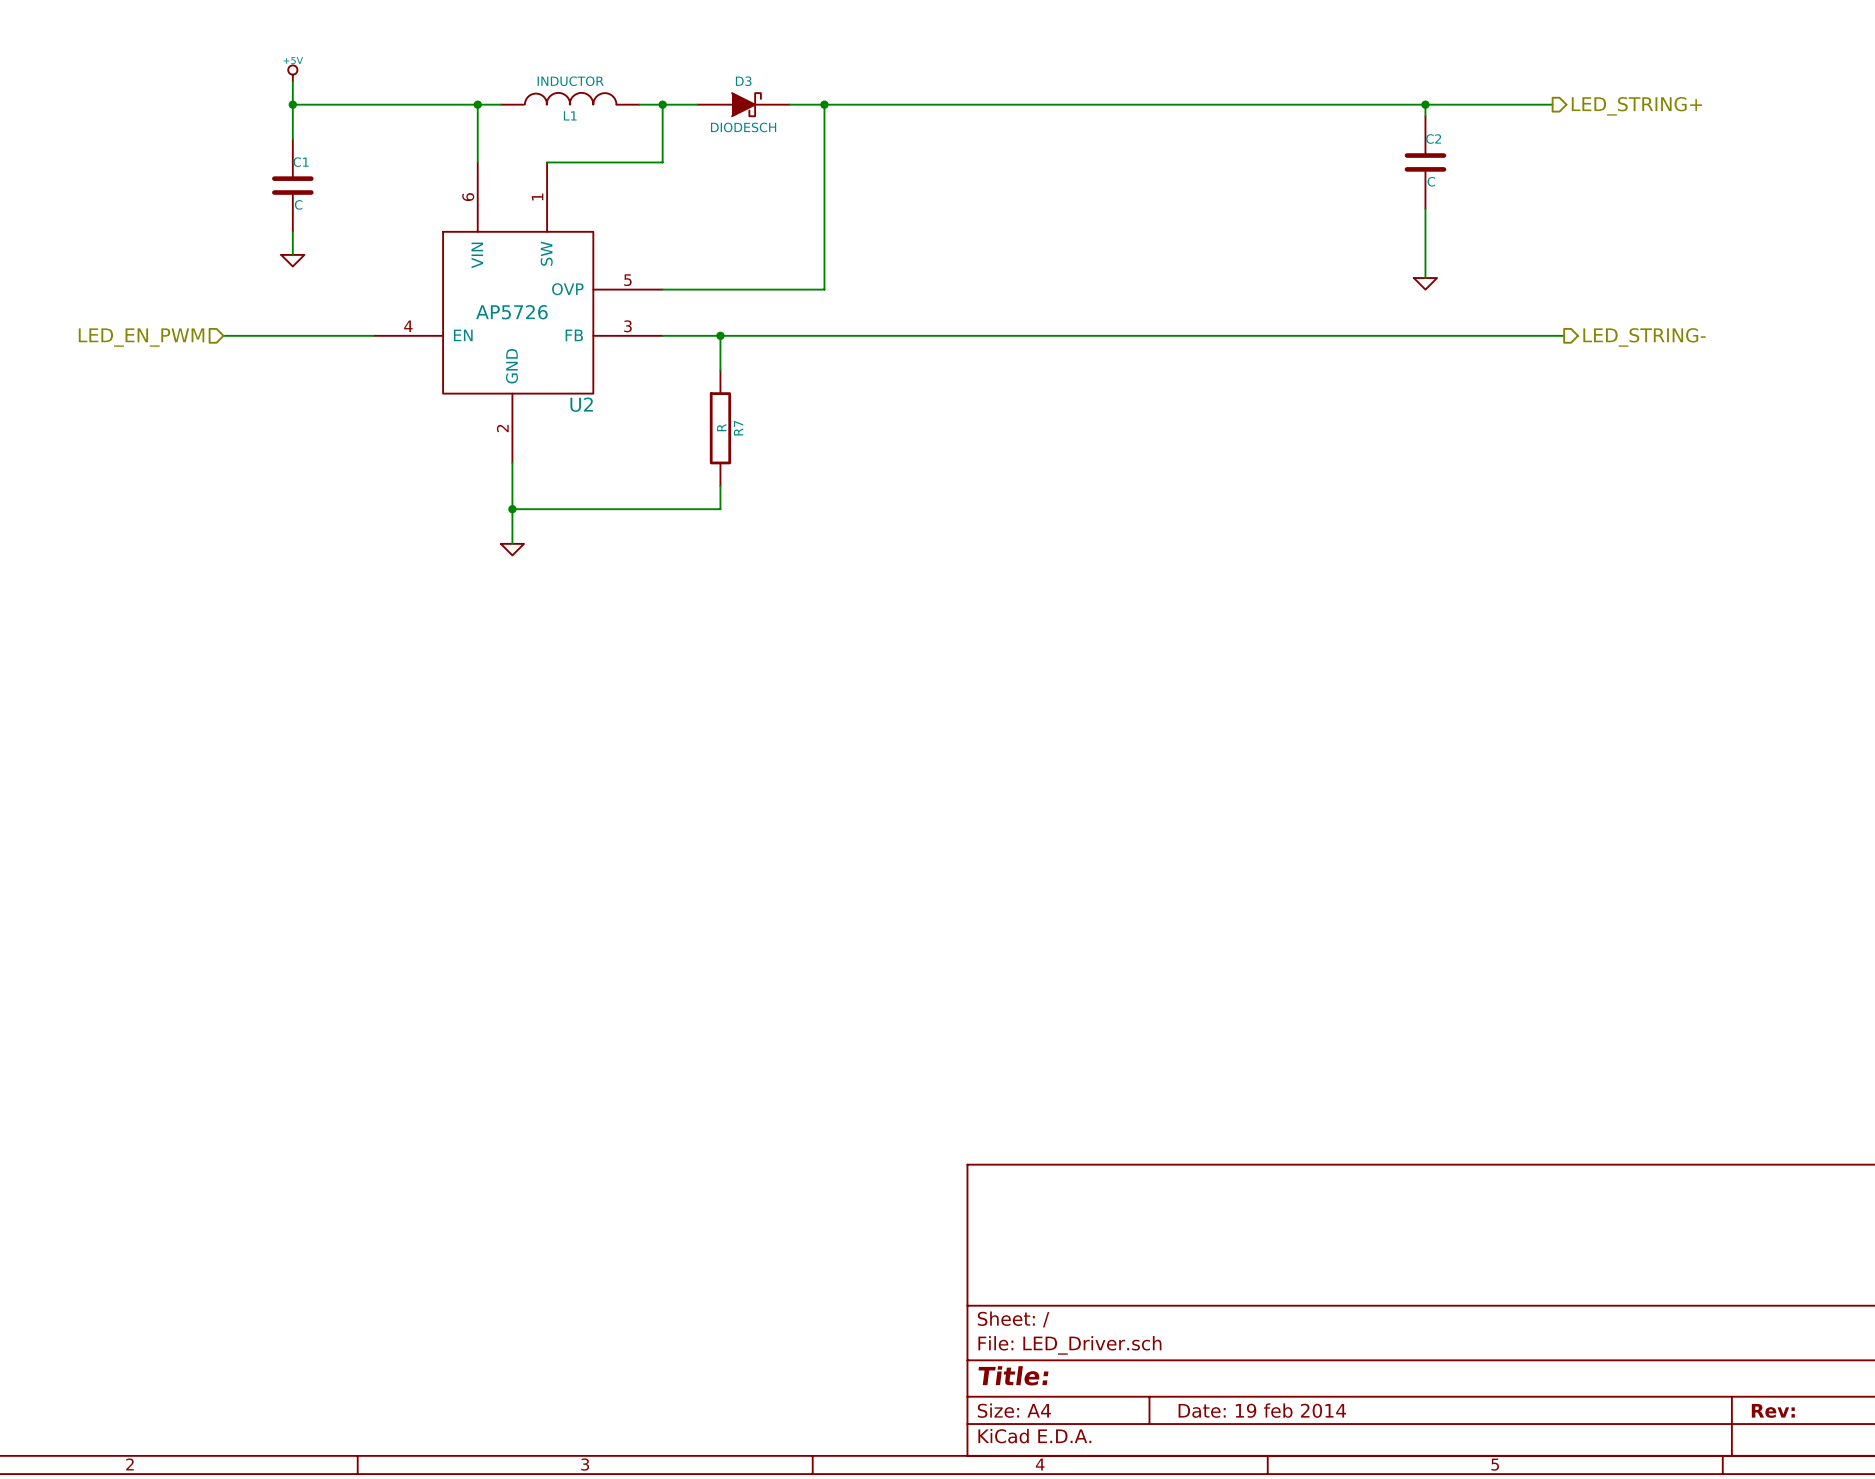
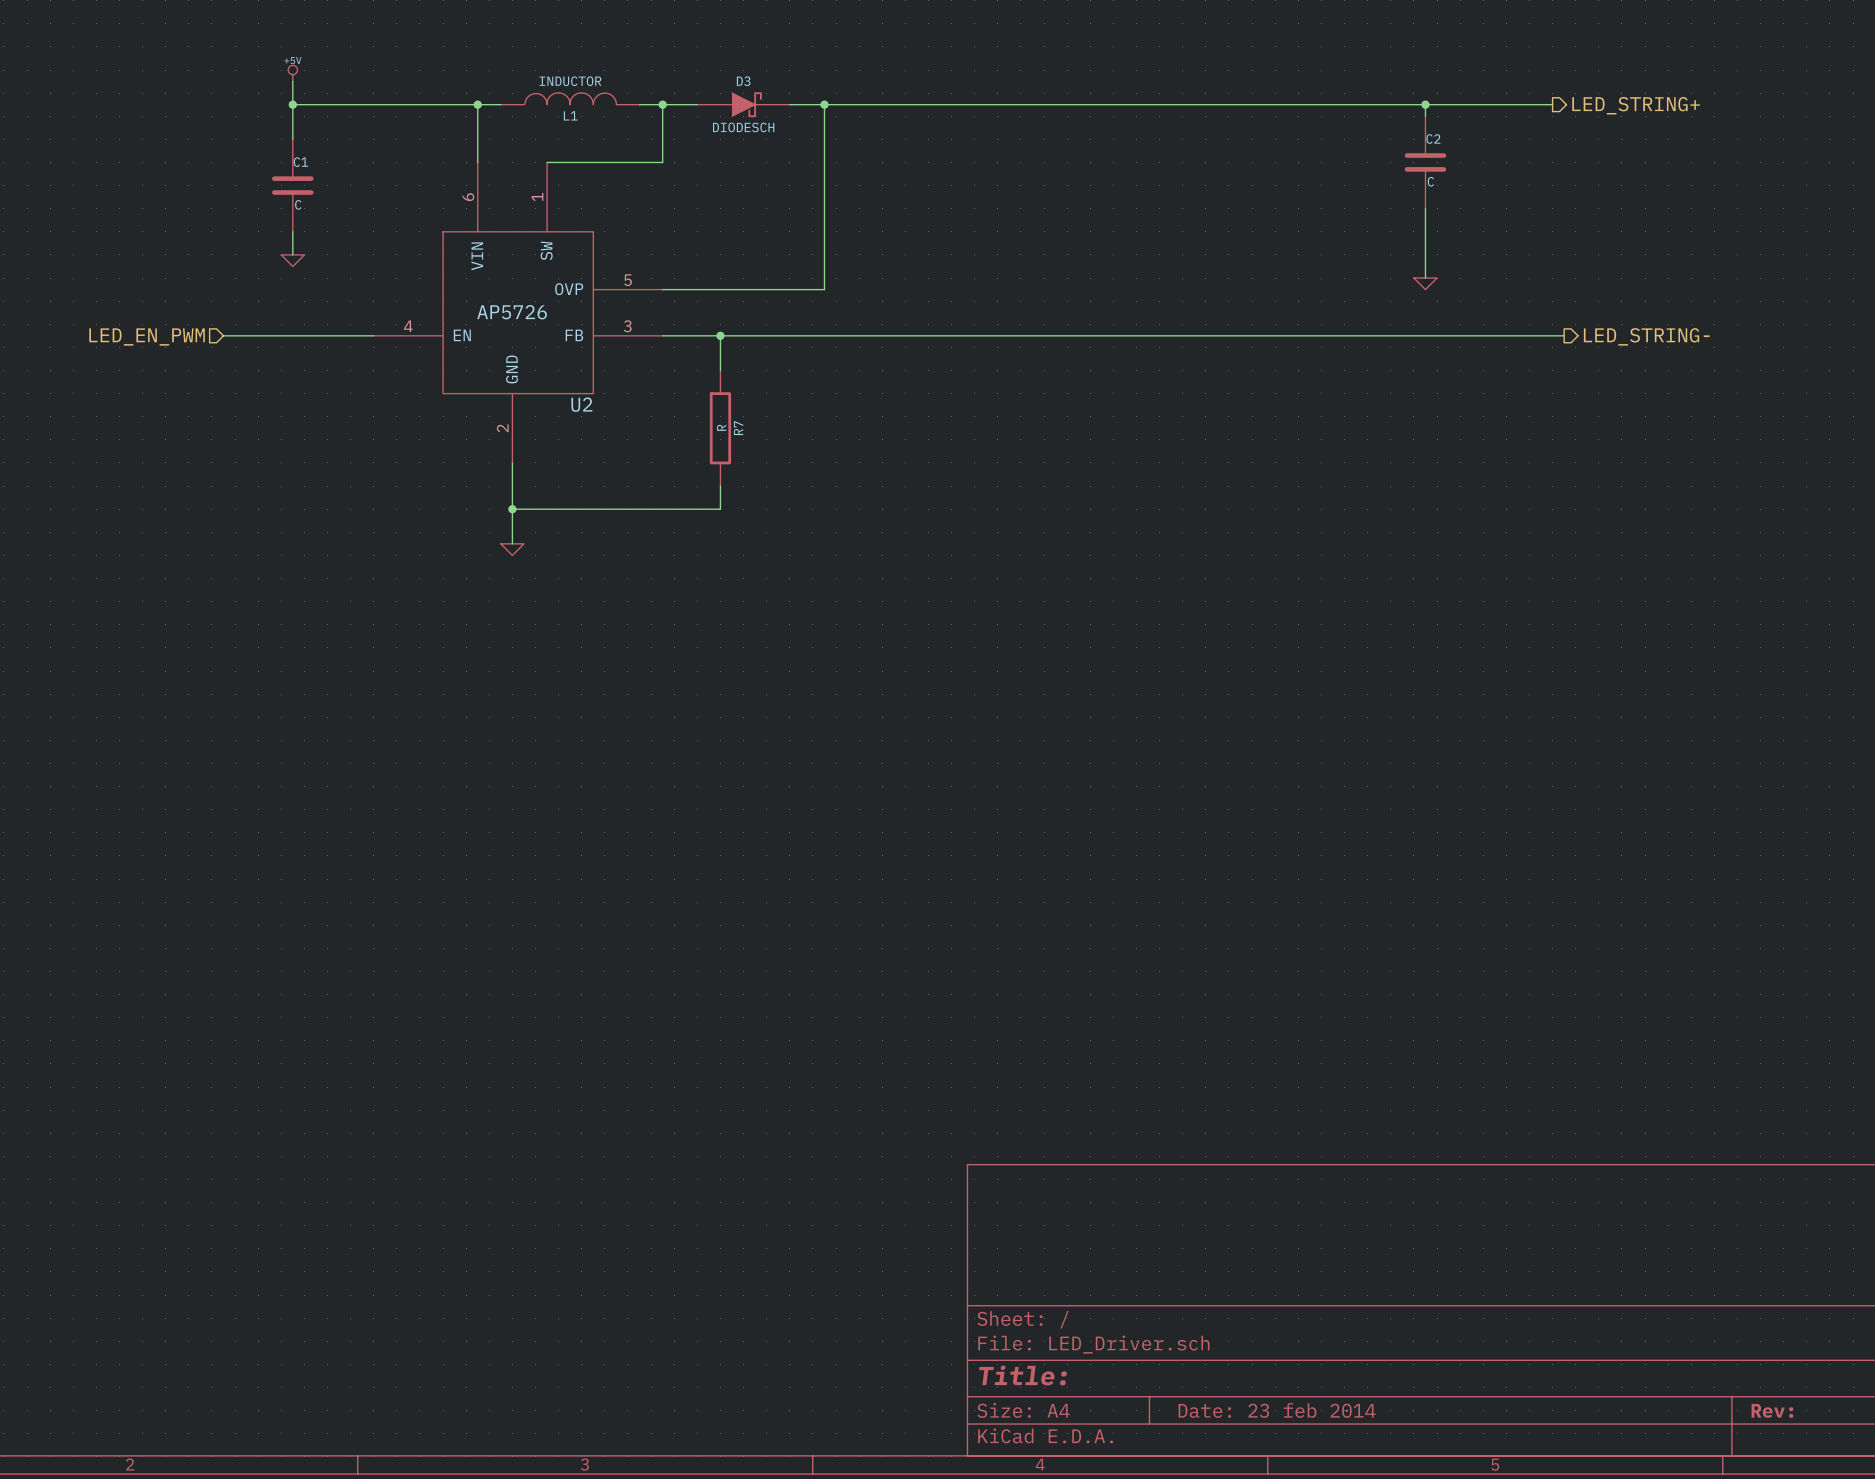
title block: Date: 19 feb 2014 (1262, 1410) -> Date: 23 feb 2014 (1277, 1410)

